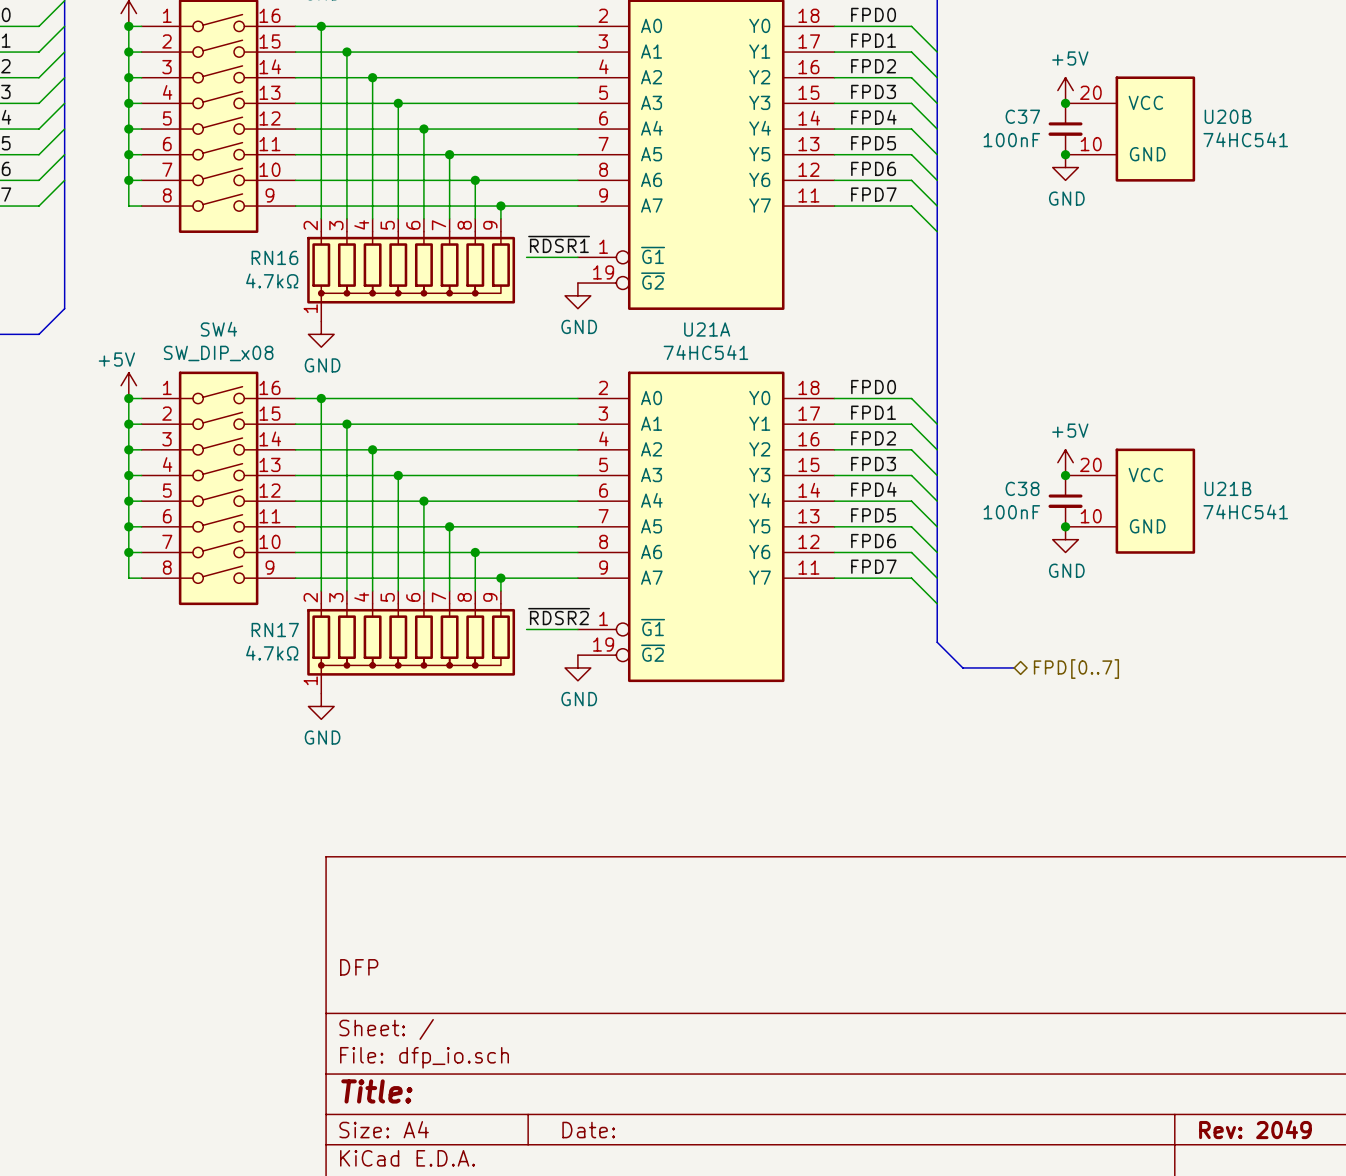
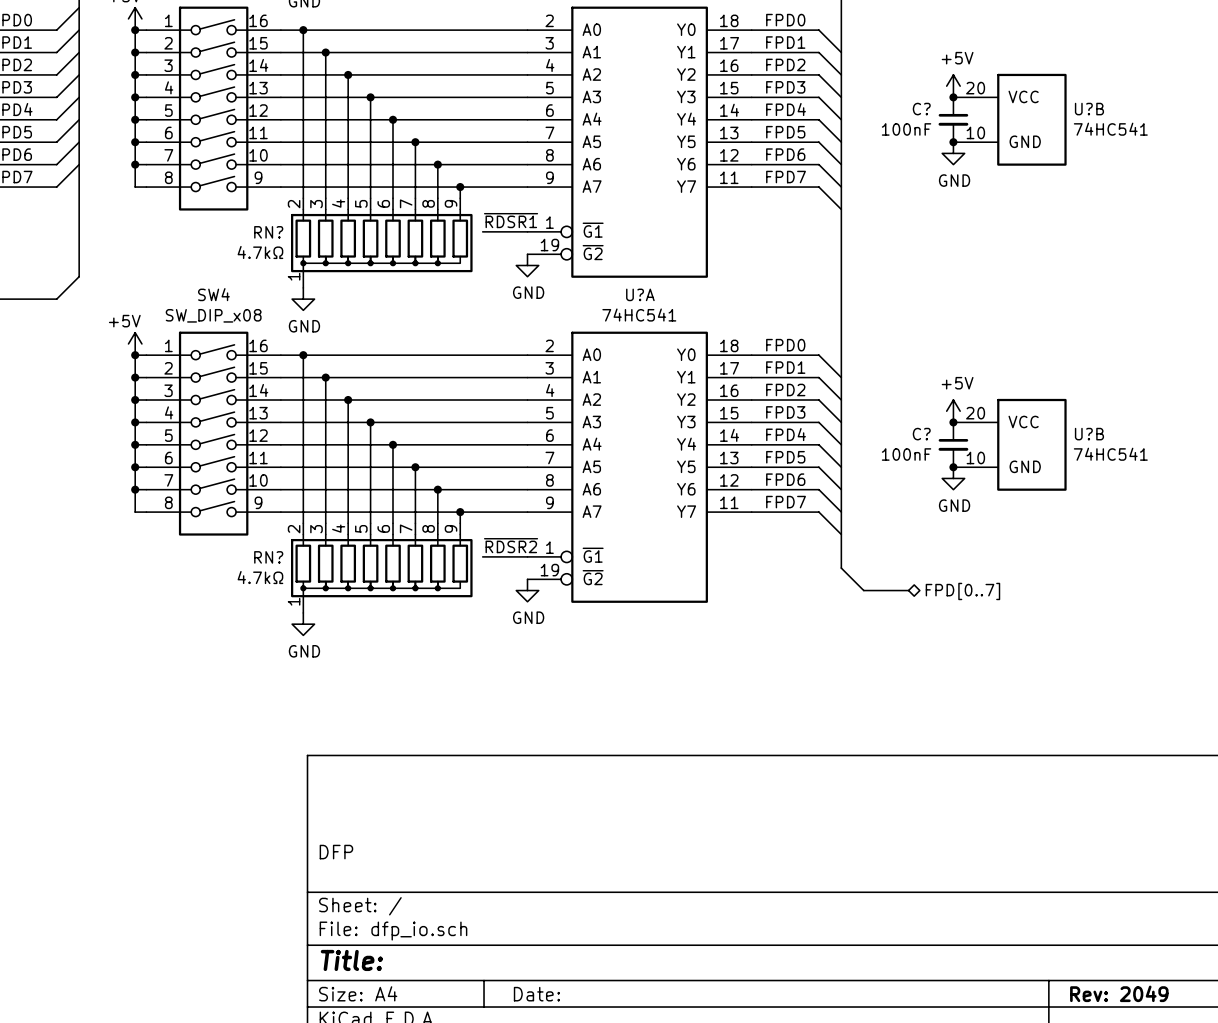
C37 name: C37 (1022, 116) -> C? (921, 109)
U20B name: U20B (1227, 116) -> U?B (1089, 109)
RN16 name: RN16 (274, 257) -> RN? (268, 232)
U21A name: U21A (707, 329) -> U?A (640, 294)
C38 name: C38 (1022, 488) -> C? (921, 434)
U21B name: U21B (1227, 488) -> U?B (1089, 434)
RN17 name: RN17 (275, 630) -> RN? (268, 557)

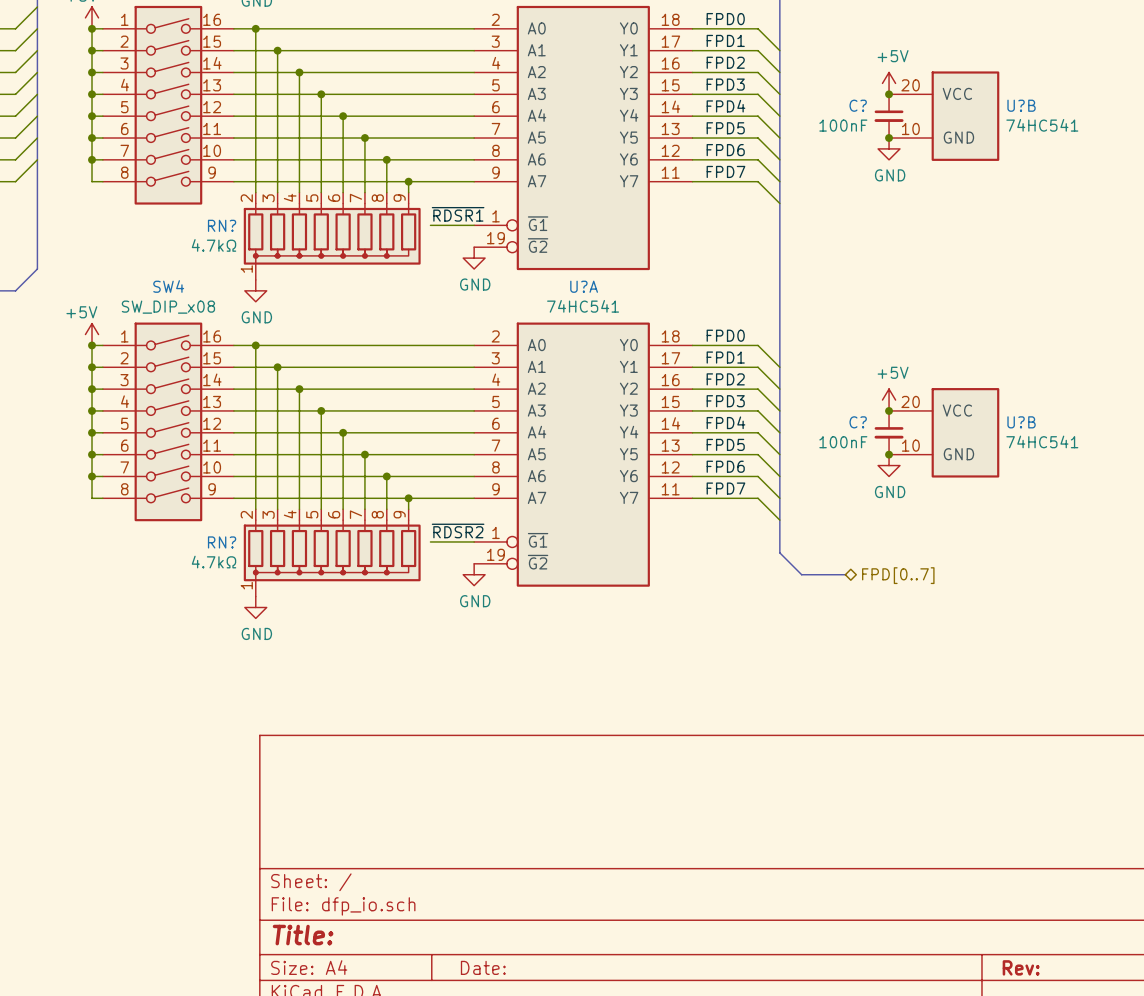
title block: DFP (336, 852) -> none
title block: Rev: 2049 (1119, 993) -> Rev: (1021, 967)

